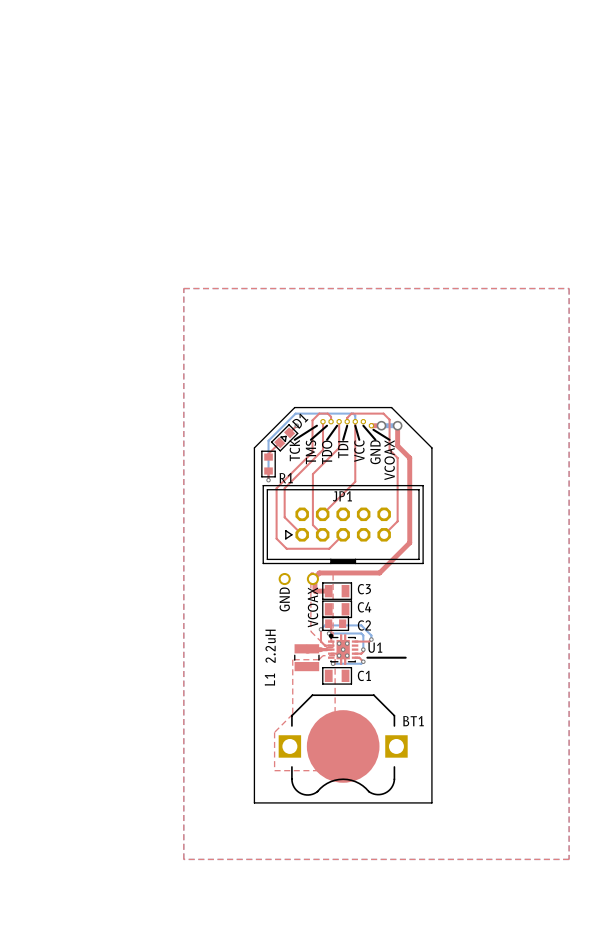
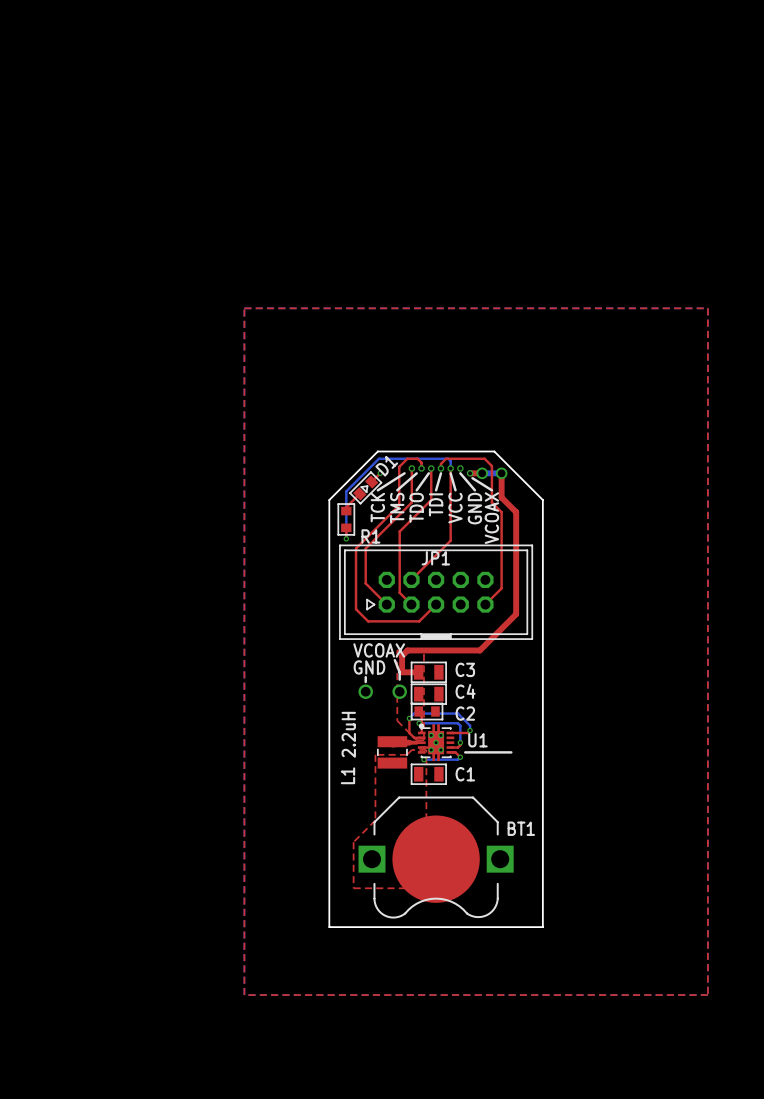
part: (284, 579) -> none
part: (312, 579) -> none
line: none -> (394, 660) (399, 672) (399, 679)
line: none -> (365, 677) (365, 682)
text rotation: 0° (284, 599) -> 90° clockwise (369, 667)
part: none -> (365, 691)
text rotation: 0° (312, 607) -> 90° clockwise (379, 650)
part: none -> (399, 691)

